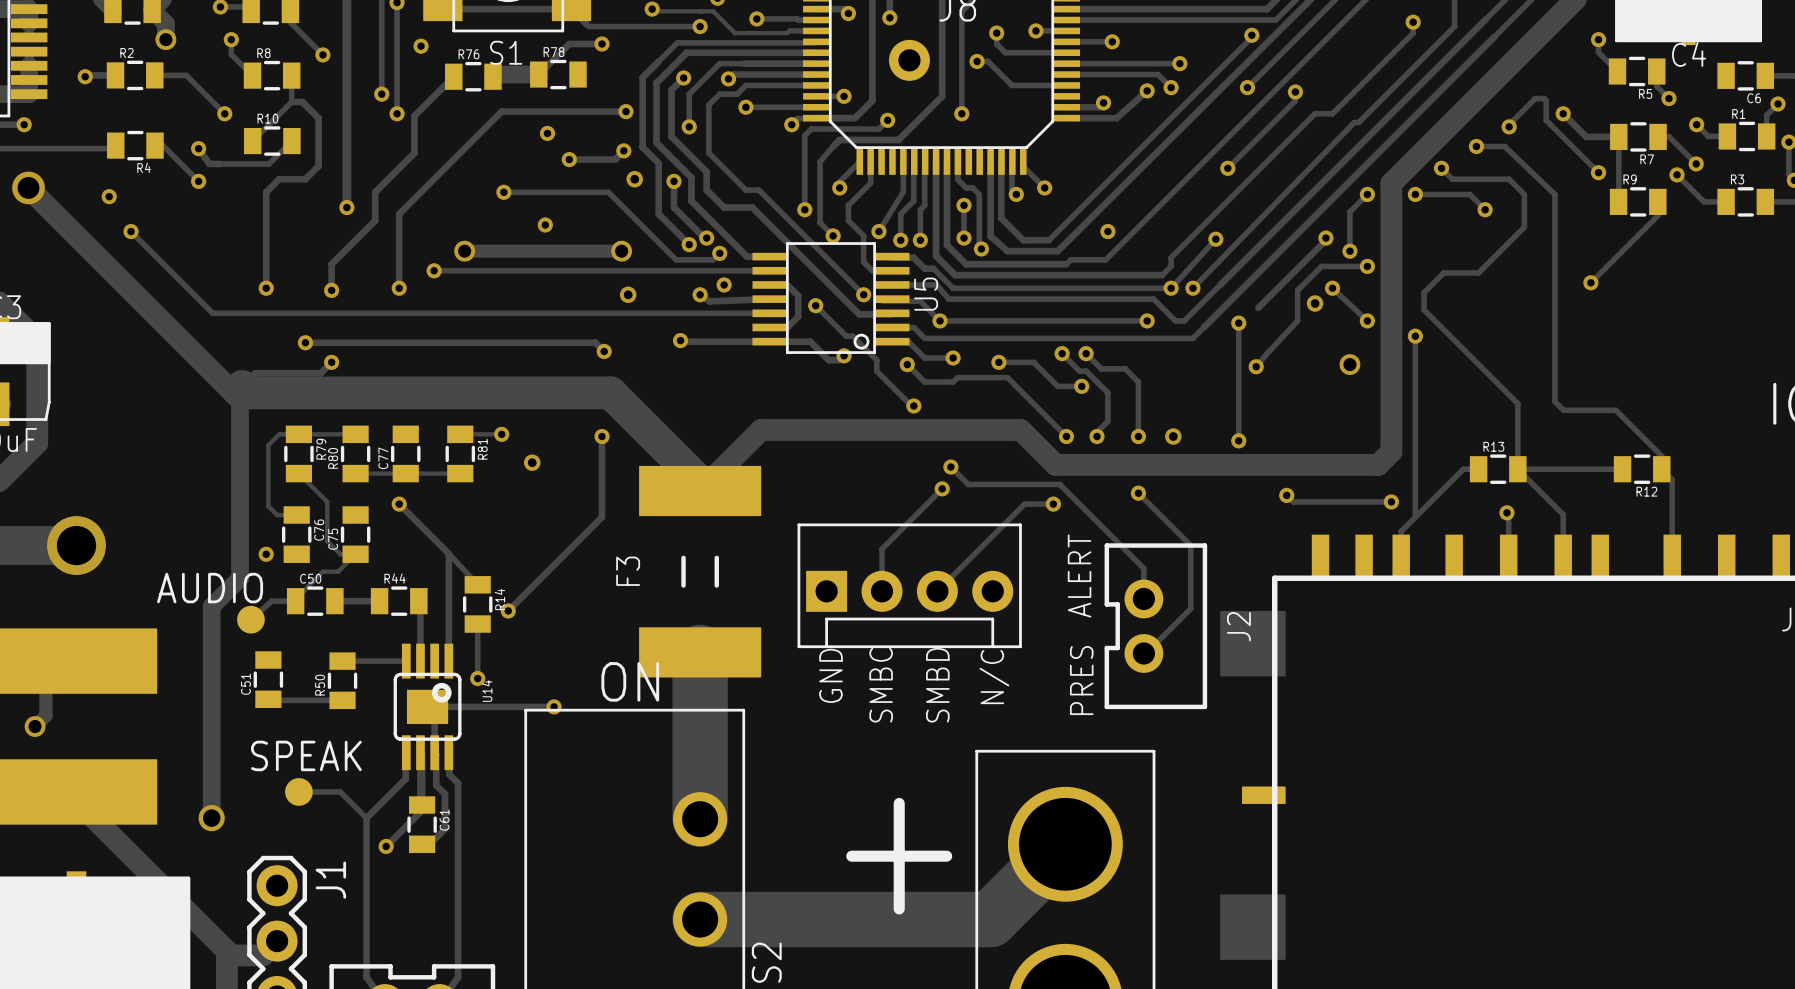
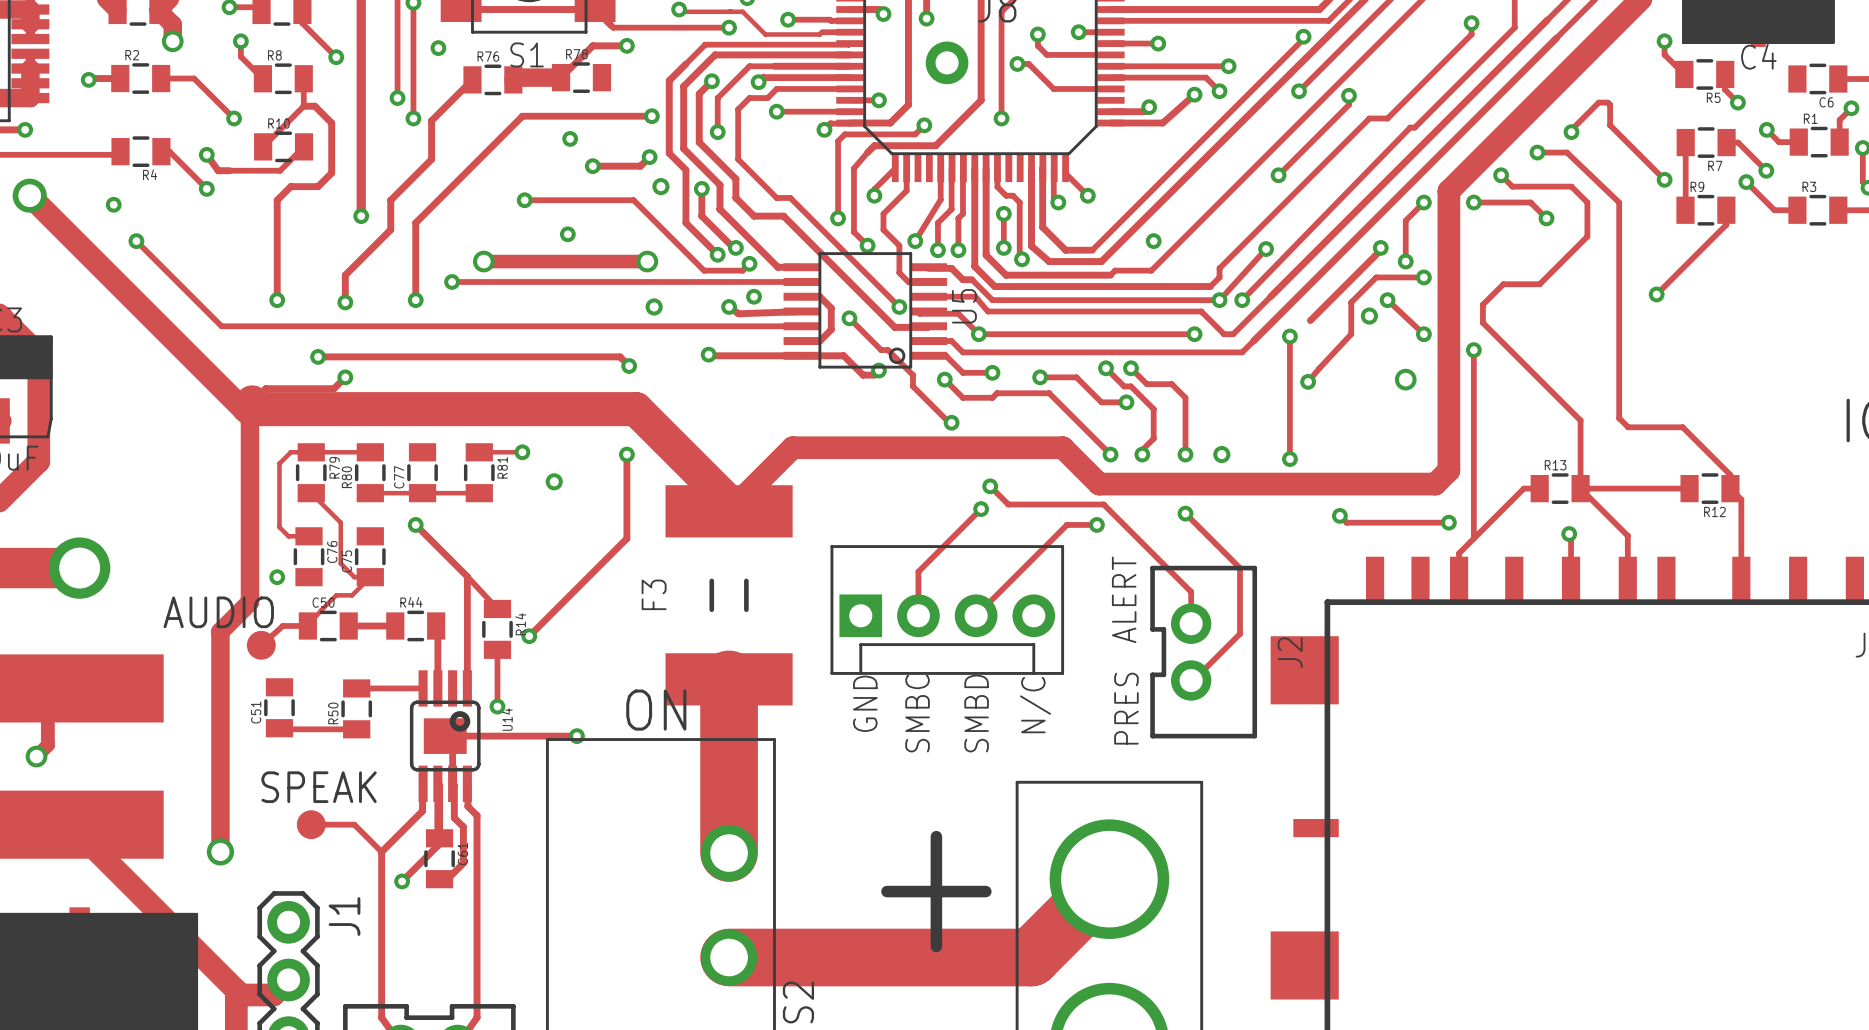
track: (1563, 113) (1586, 136) (1618, 136) -> none
via: (1563, 113) -> none

